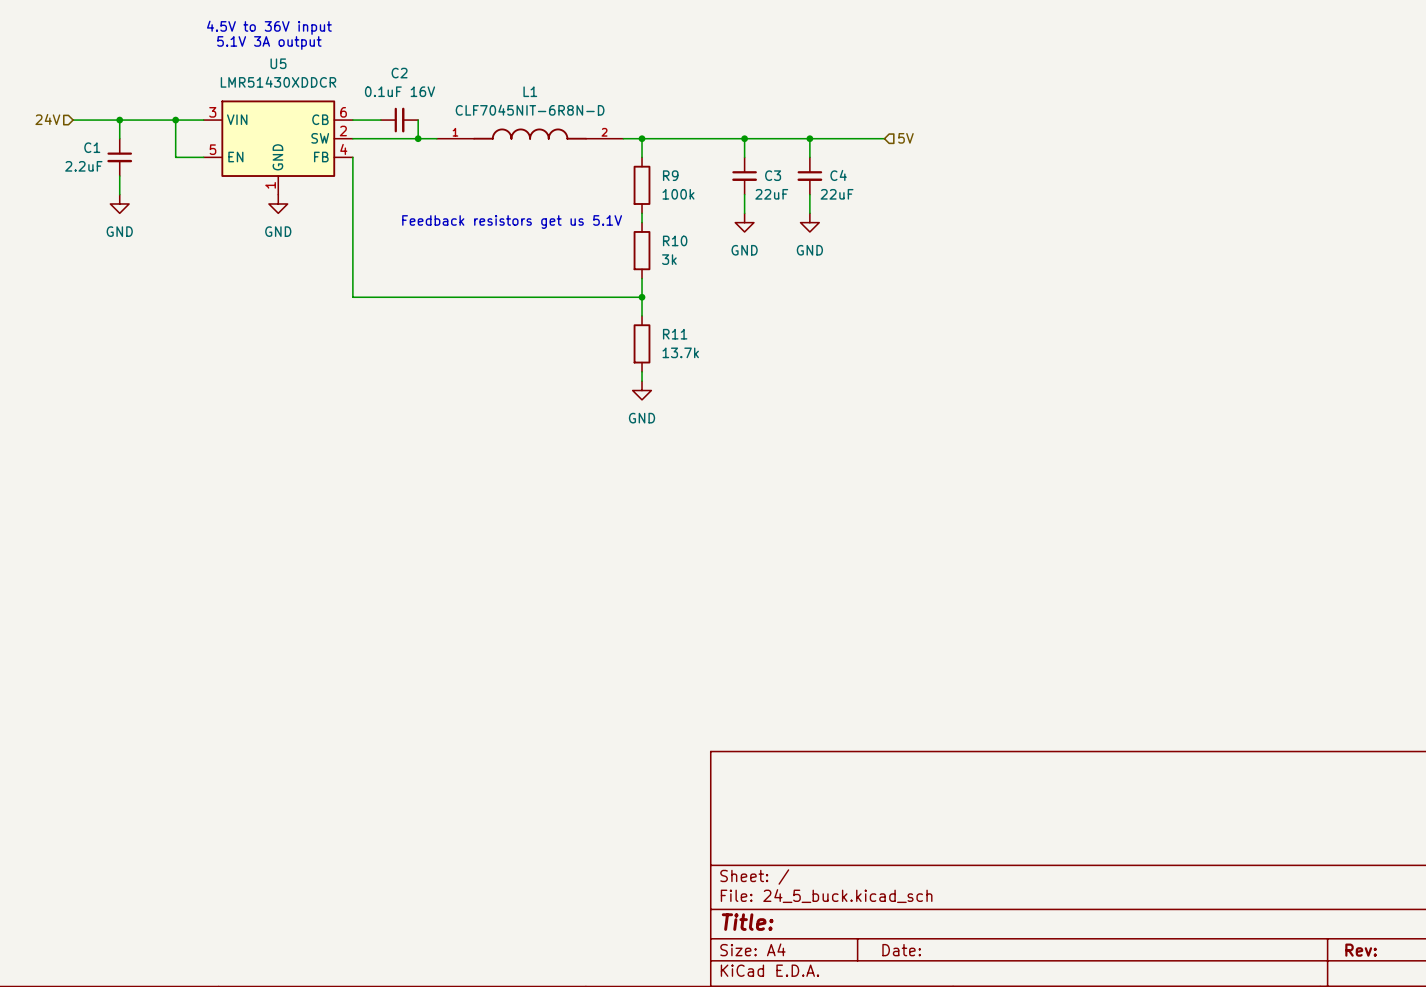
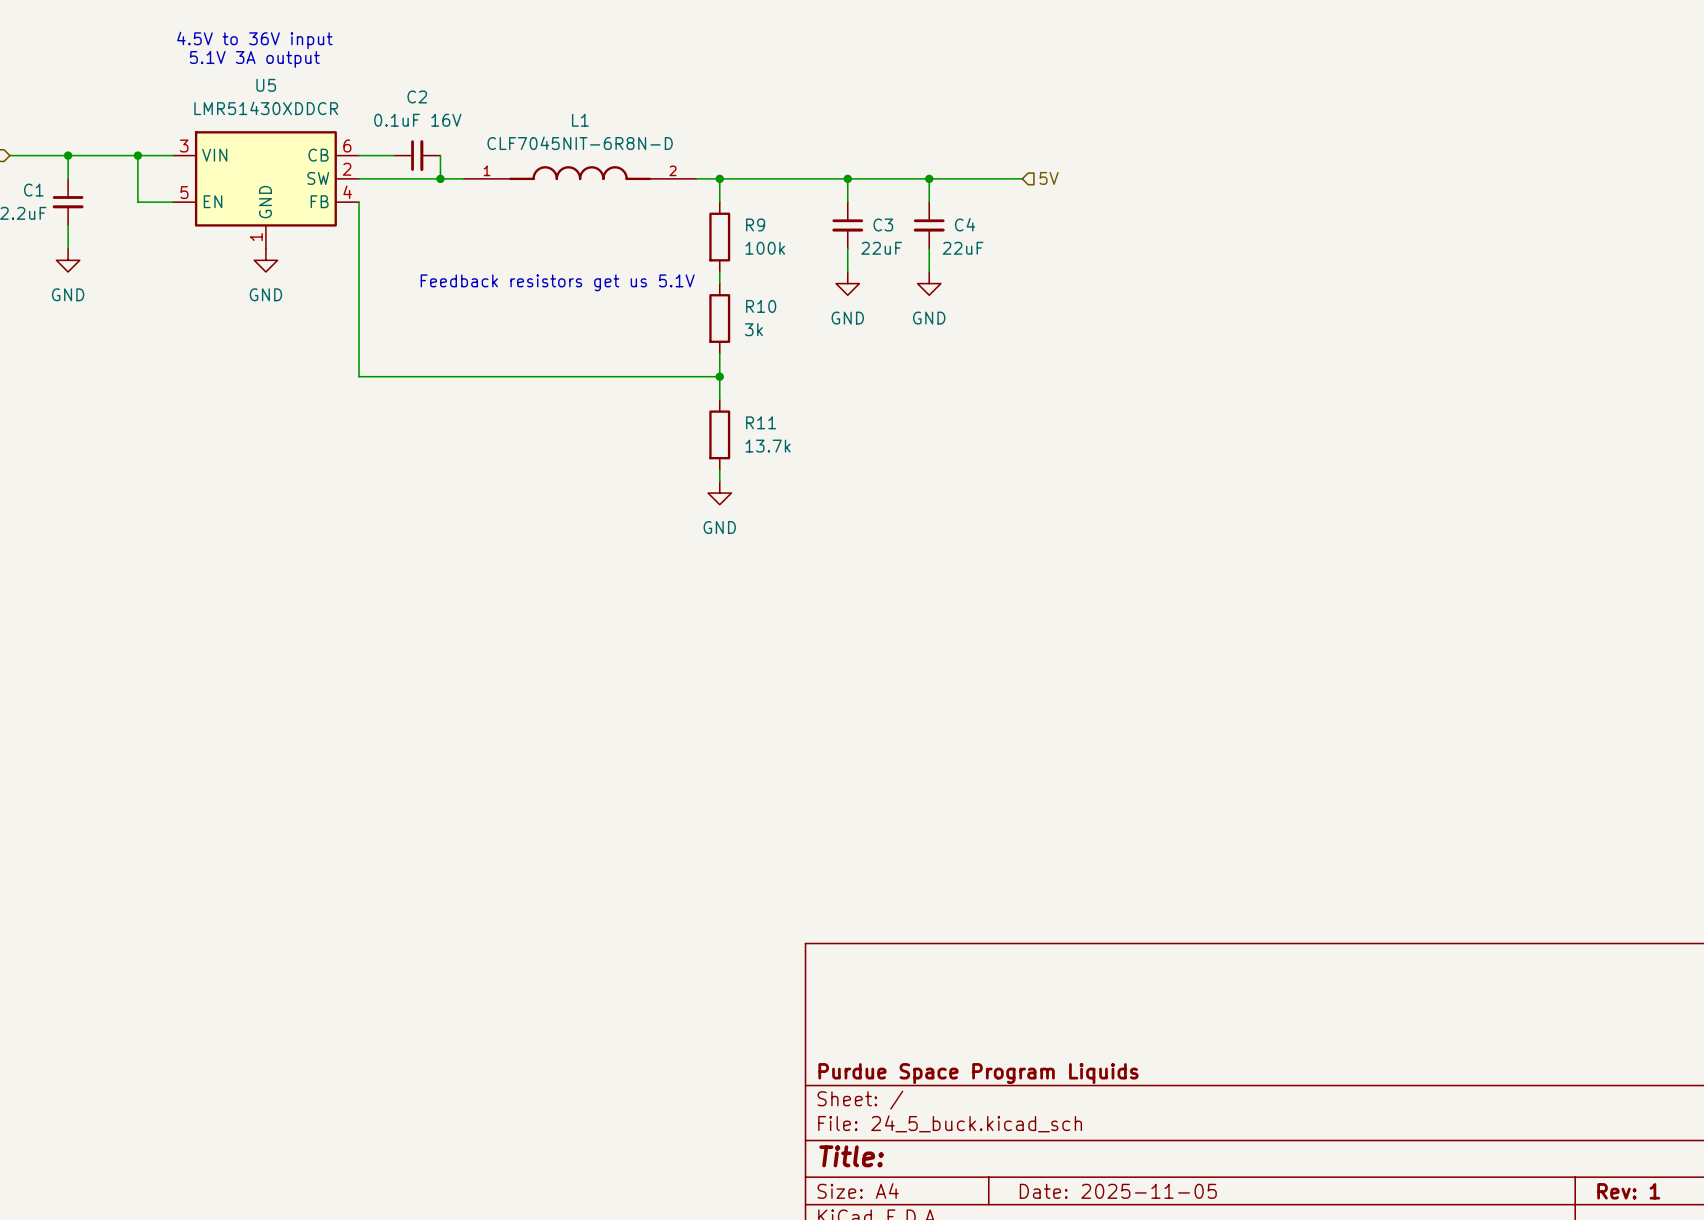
title block: none -> Purdue Space Program Liquids (978, 1073)
title block: Date: (901, 950) -> Date: 2025-11-05 (1118, 1191)
title block: Rev: (1361, 950) -> Rev: 1 (1628, 1191)

